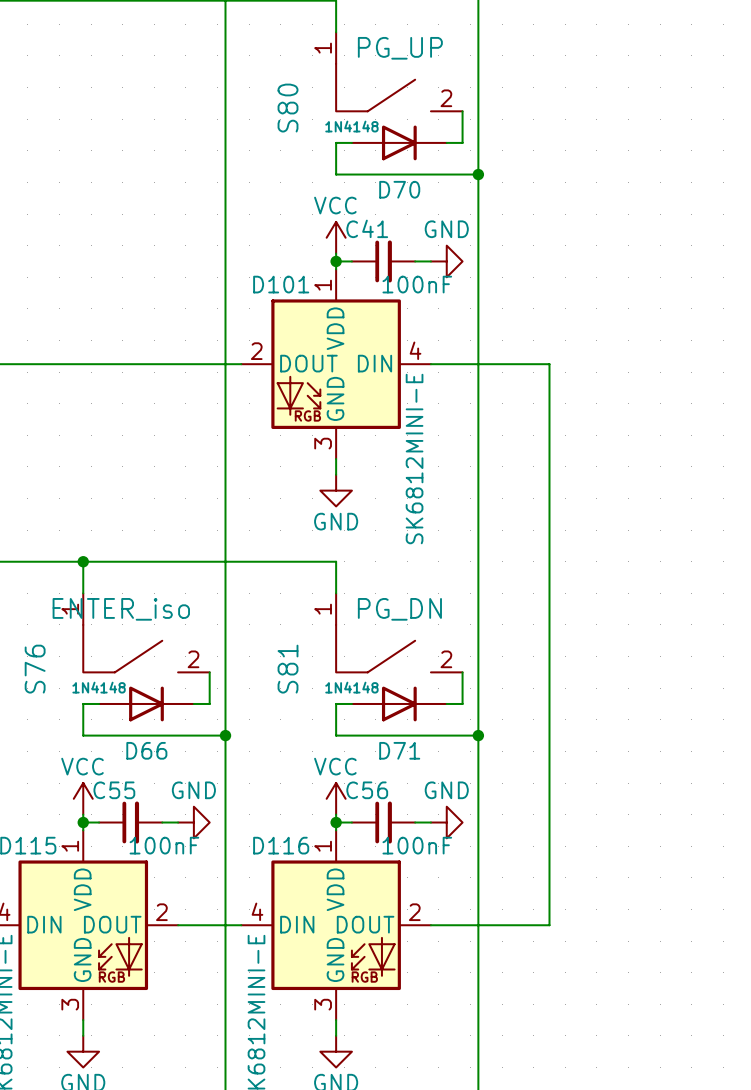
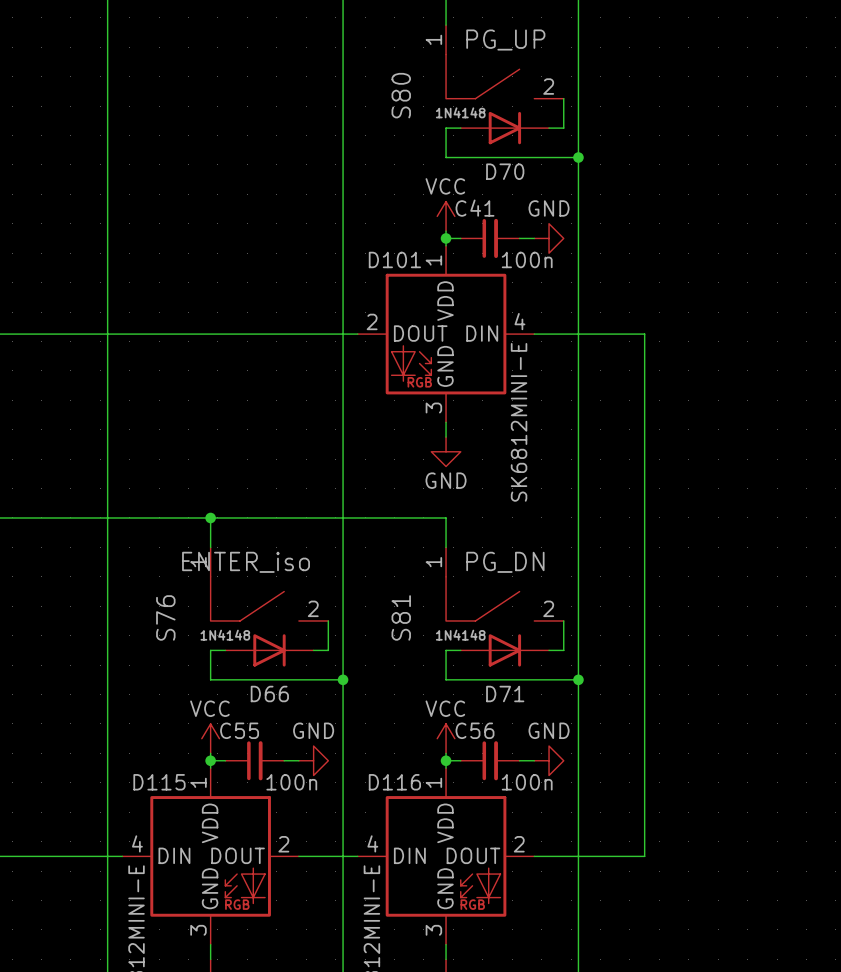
C41 value: 100nF (417, 284) -> 100n (527, 259)
C55 value: 100nF (164, 845) -> 100n (291, 782)
C56 value: 100nF (417, 845) -> 100n (527, 782)

